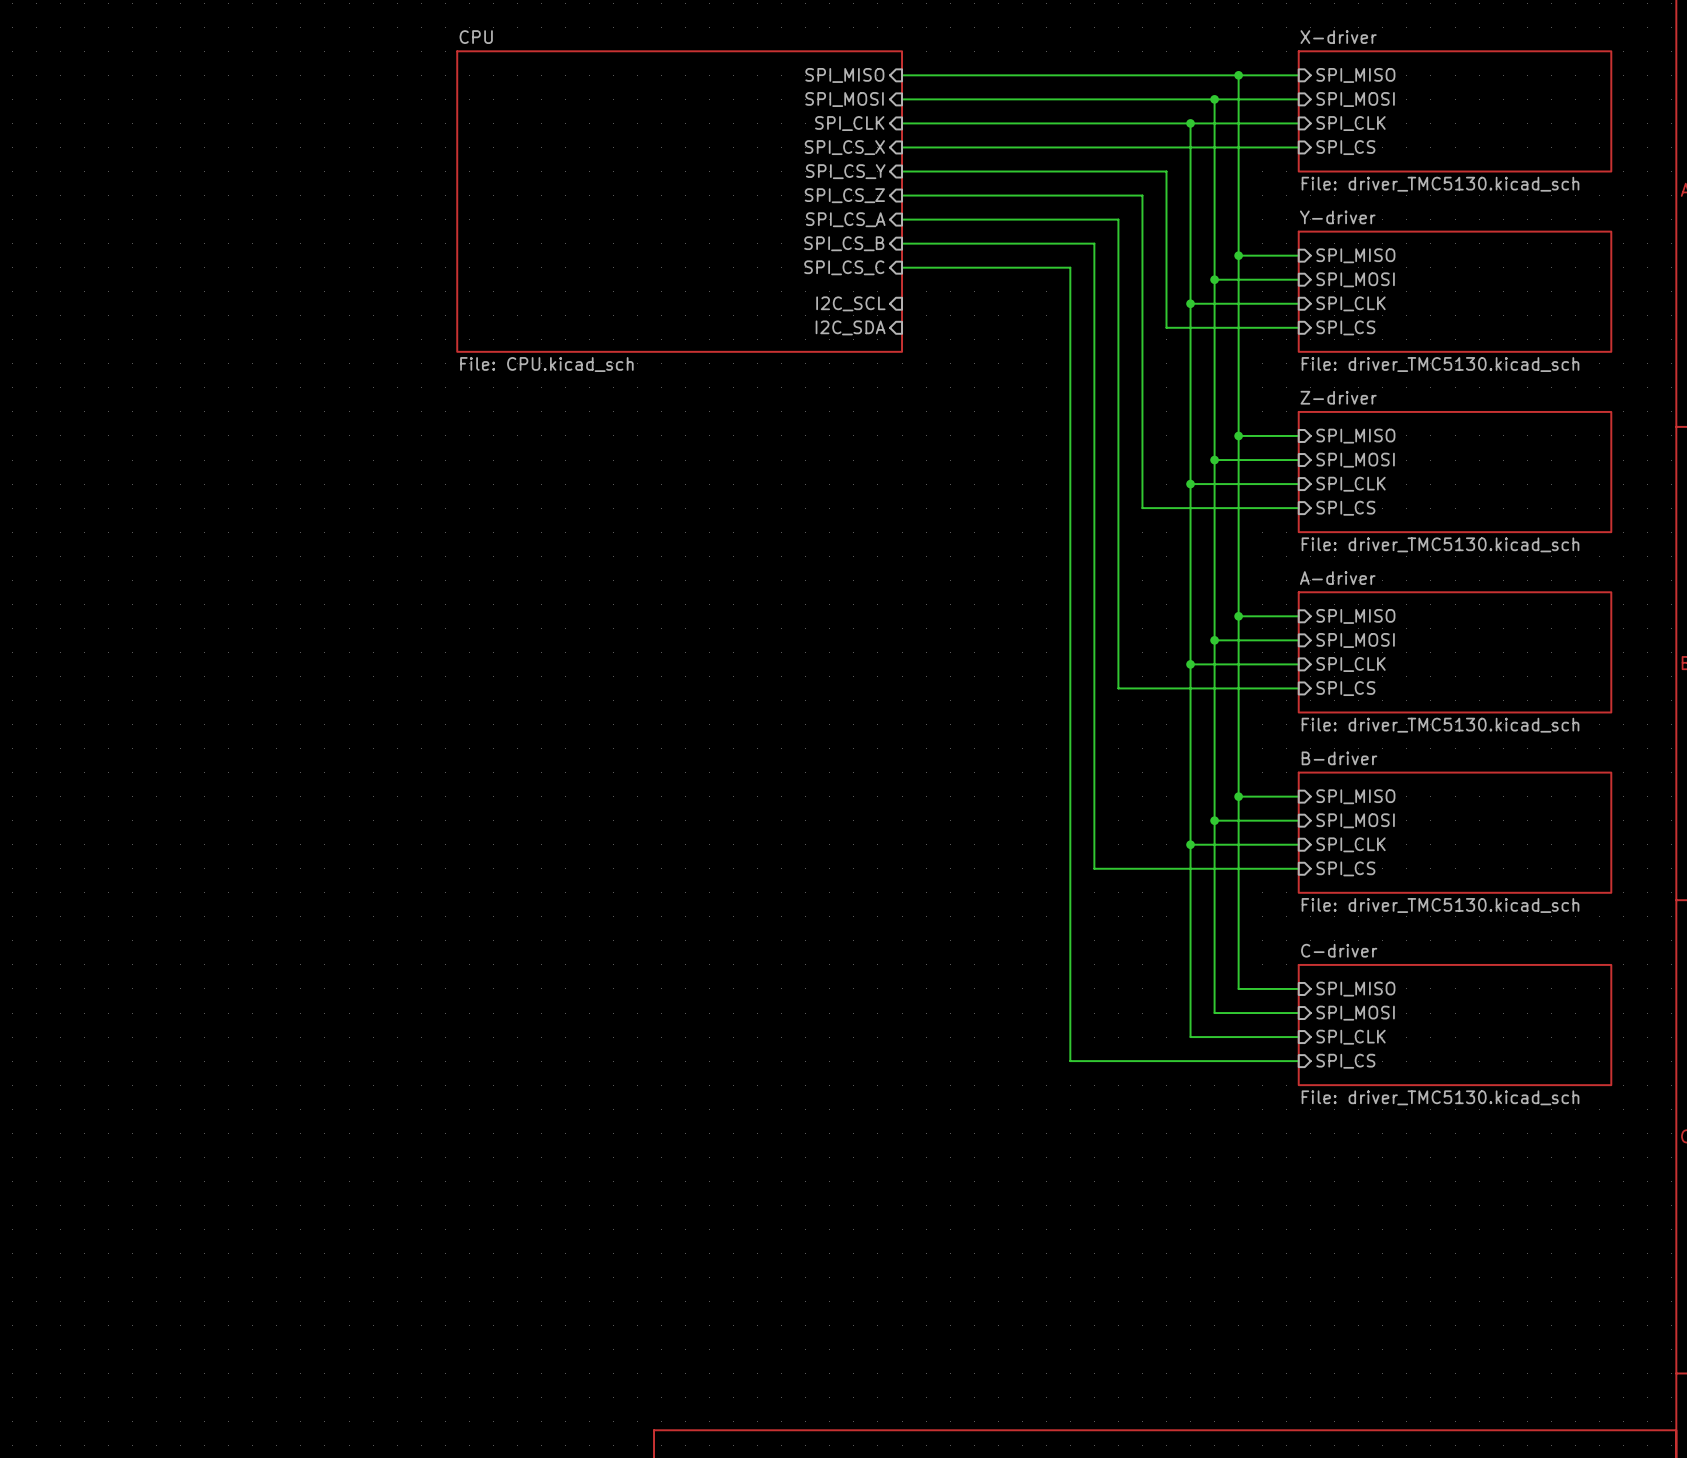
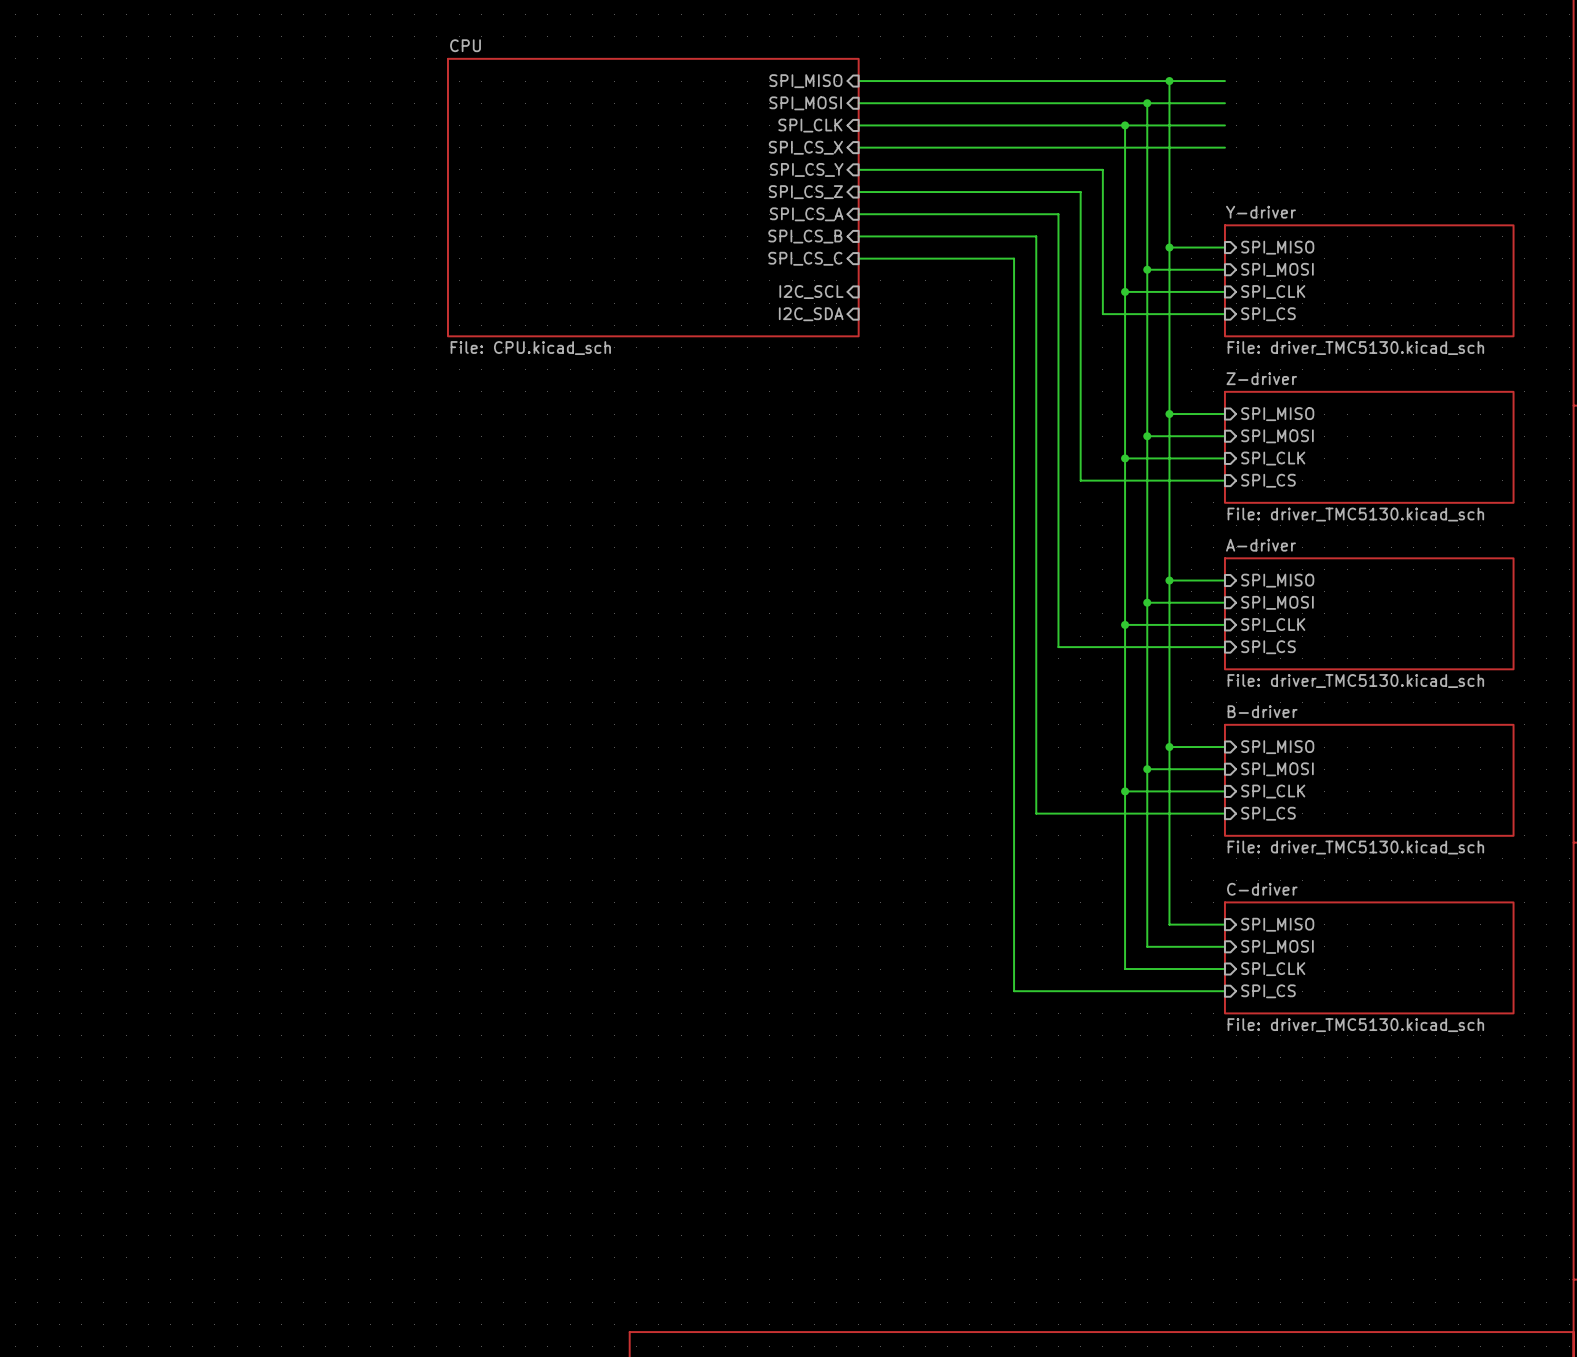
sheet pin: SPI_MISO (1355, 75) -> none
sheet pin: SPI_MOSI (1355, 99) -> none
sheet X-driver: File: driver_TMC5130.kicad_sch (1455, 111) -> none
sheet pin: SPI_CLK (1351, 123) -> none
sheet pin: SPI_CS (1345, 147) -> none

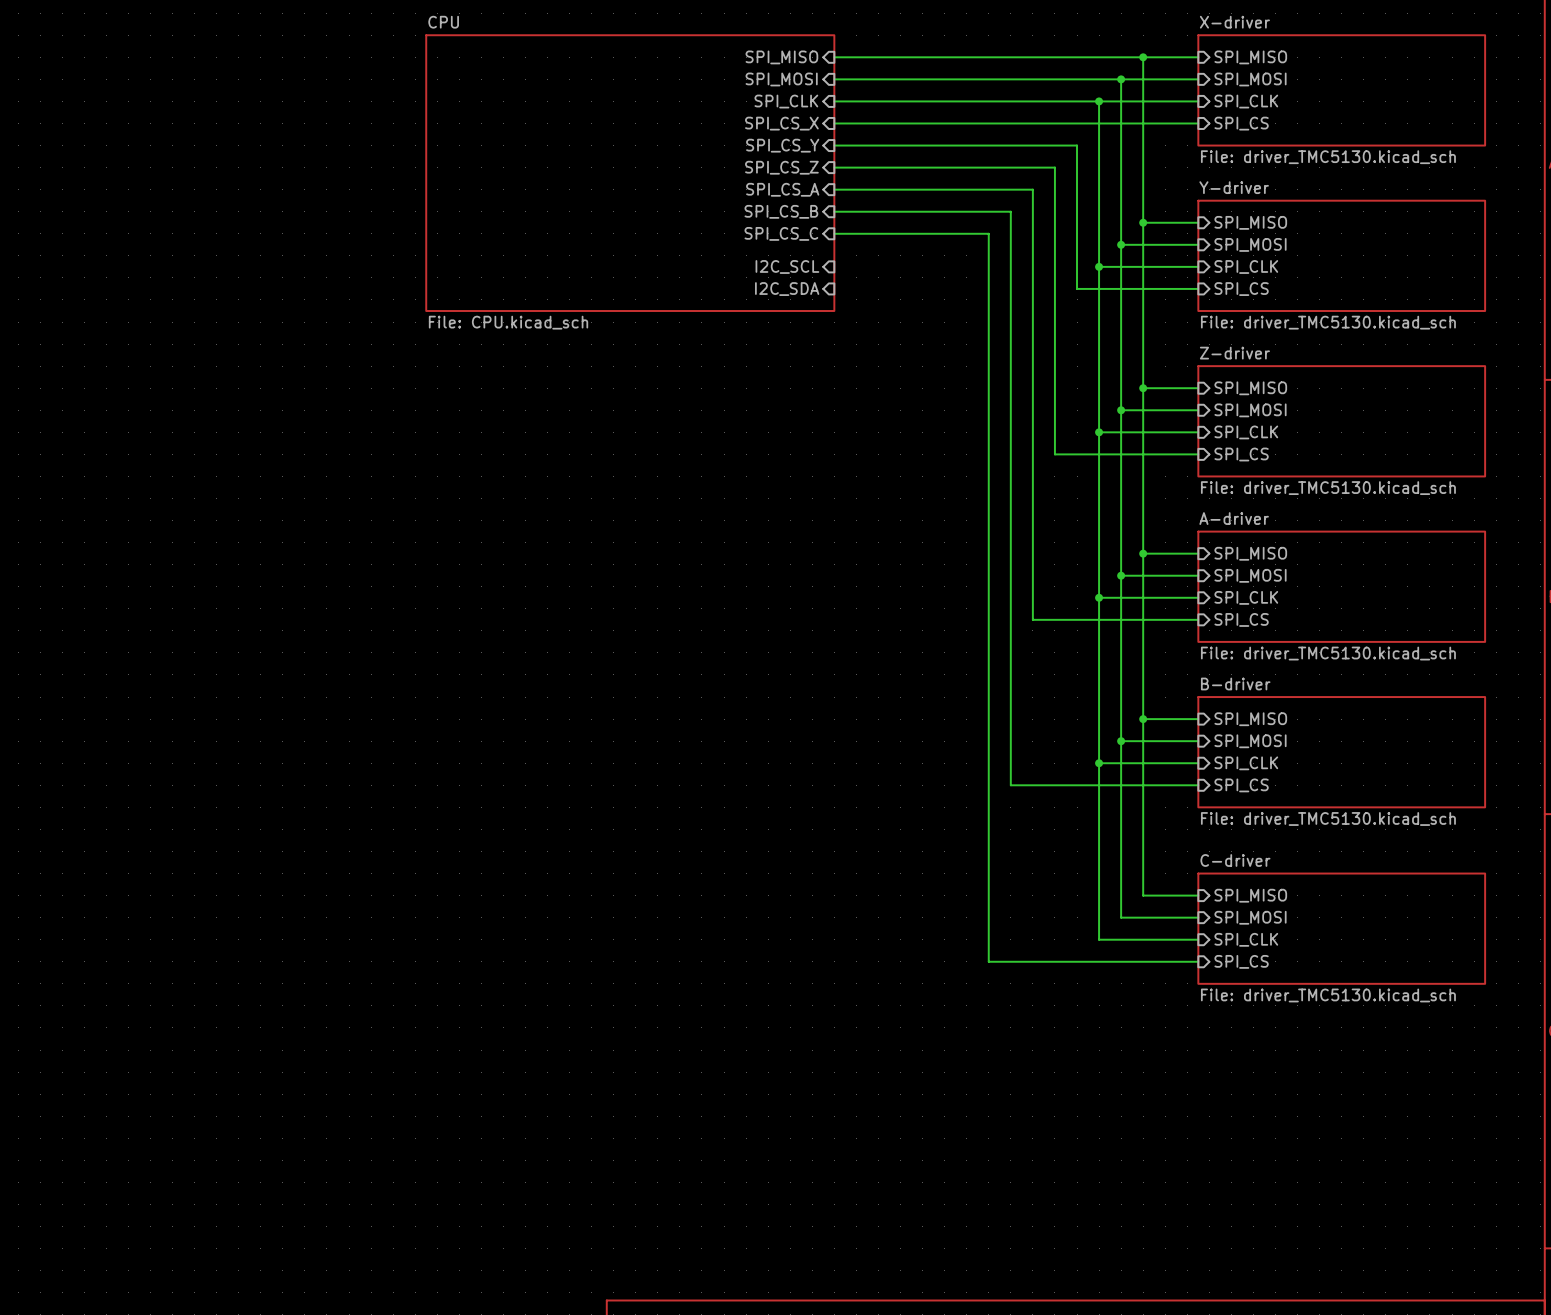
sheet pin: none -> SPI_MISO (1250, 57)
sheet pin: none -> SPI_MOSI (1250, 79)
sheet X-driver: none -> File: driver_TMC5130.kicad_sch (1341, 90)
sheet pin: none -> SPI_CLK (1246, 101)
sheet pin: none -> SPI_CS (1241, 123)

